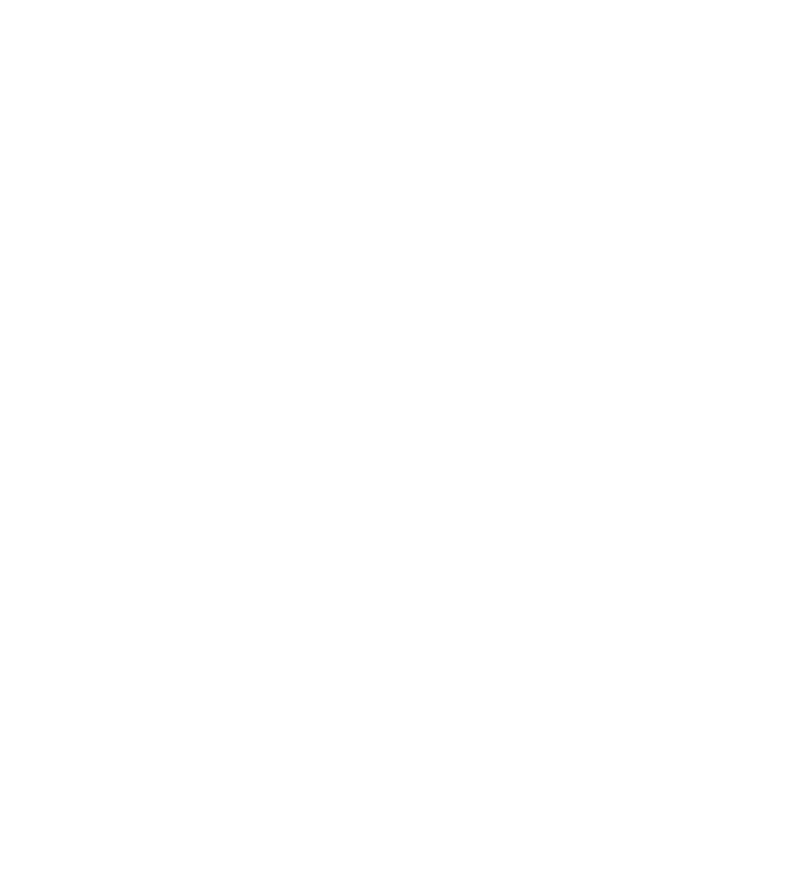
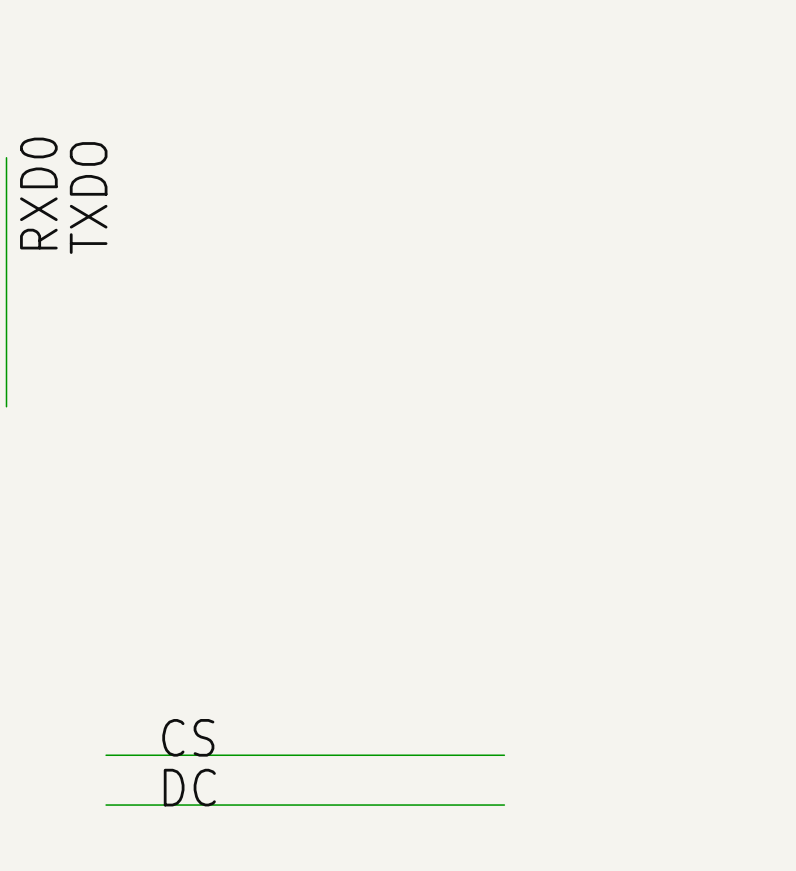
wire: none -> (6, 157) (6, 406)
label: none -> RXD0 (38, 193)
label: none -> TXDO (88, 198)
label: none -> CS (188, 737)
wire: none -> (106, 755) (504, 755)
label: none -> DC (189, 787)
wire: none -> (106, 805) (504, 805)

